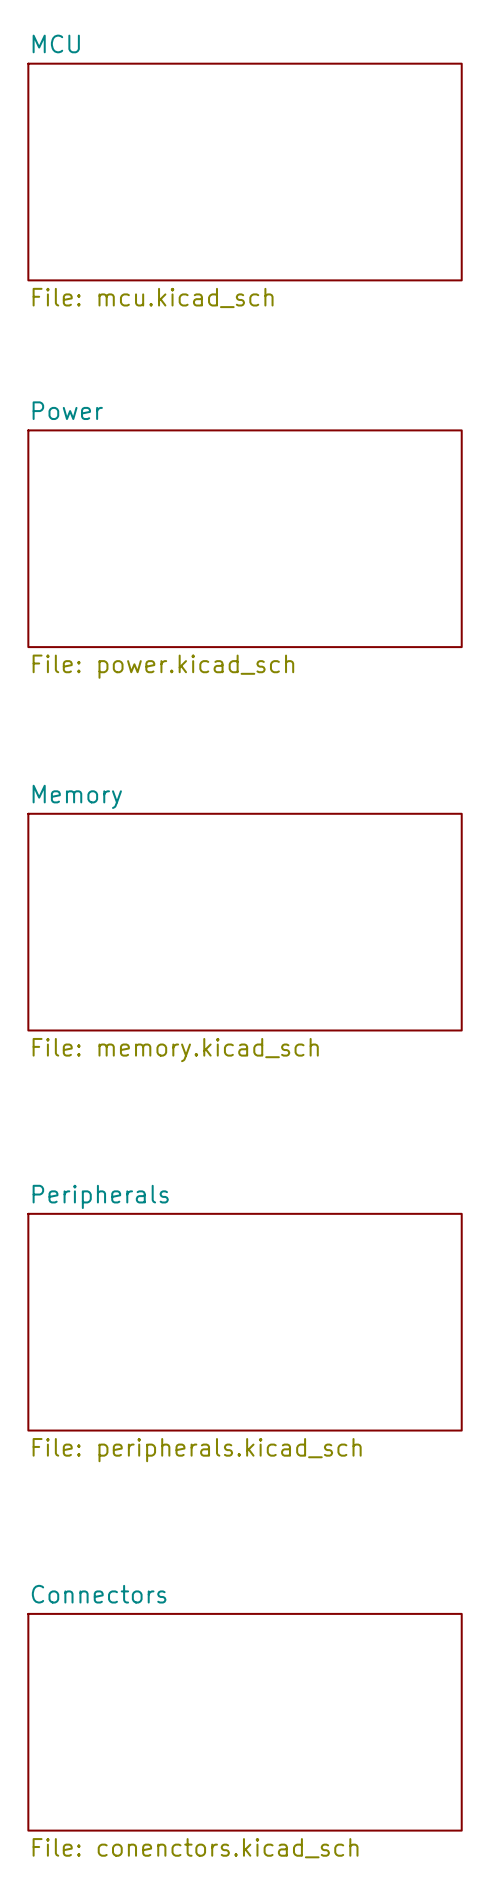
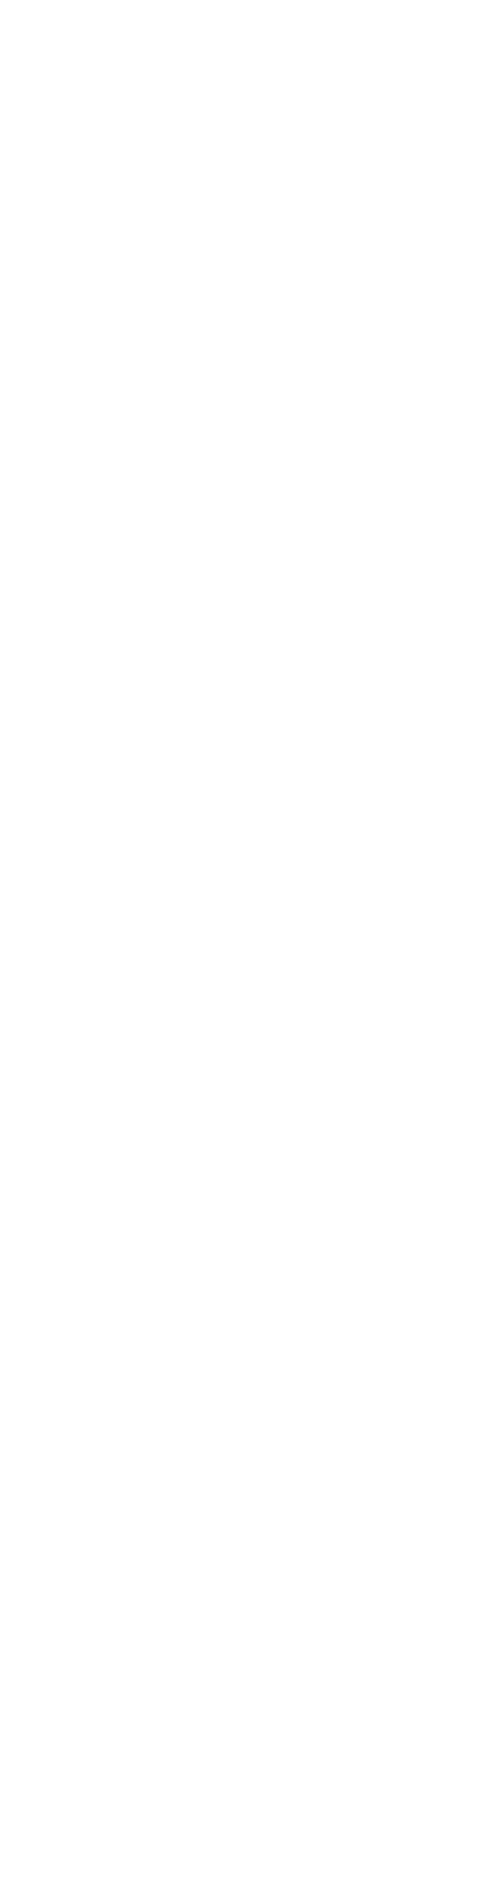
sheet MCU: File: mcu.kicad_sch (245, 172) -> none
sheet Power: File: power.kicad_sch (245, 538) -> none
sheet Memory: File: memory.kicad_sch (245, 922) -> none
sheet Peripherals: File: peripherals.kicad_sch (245, 1322) -> none
sheet Connectors: File: conenctors.kicad_sch (245, 1722) -> none

